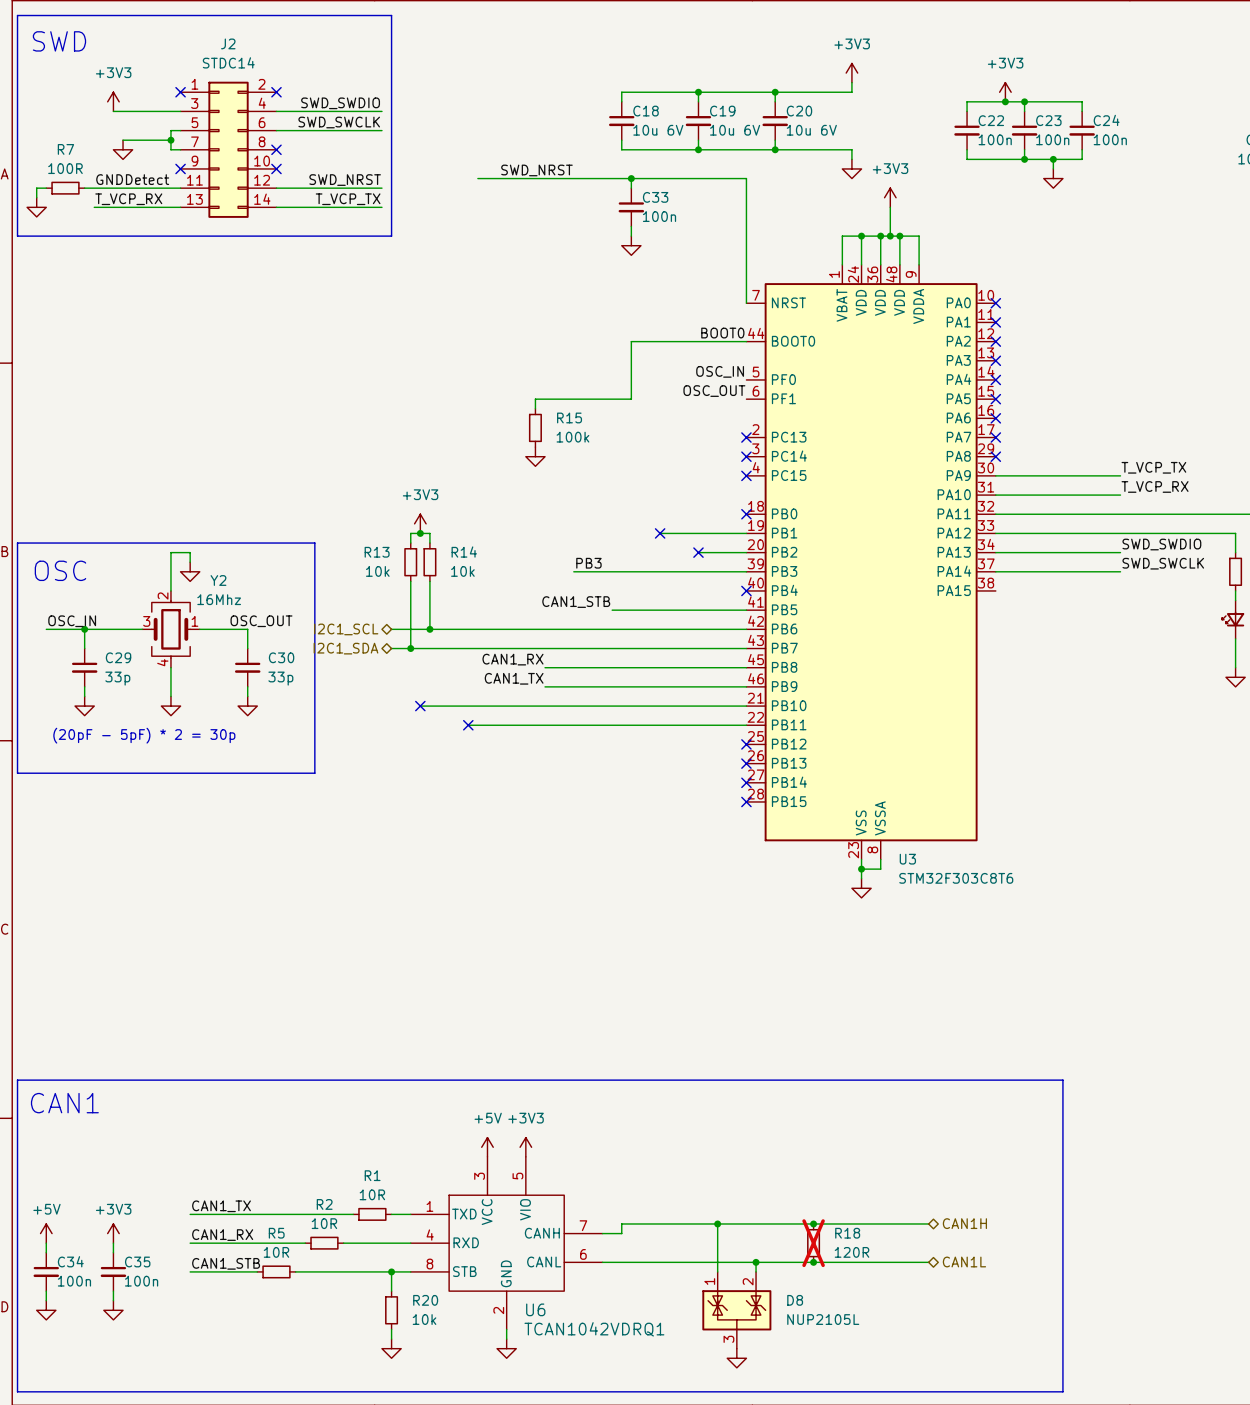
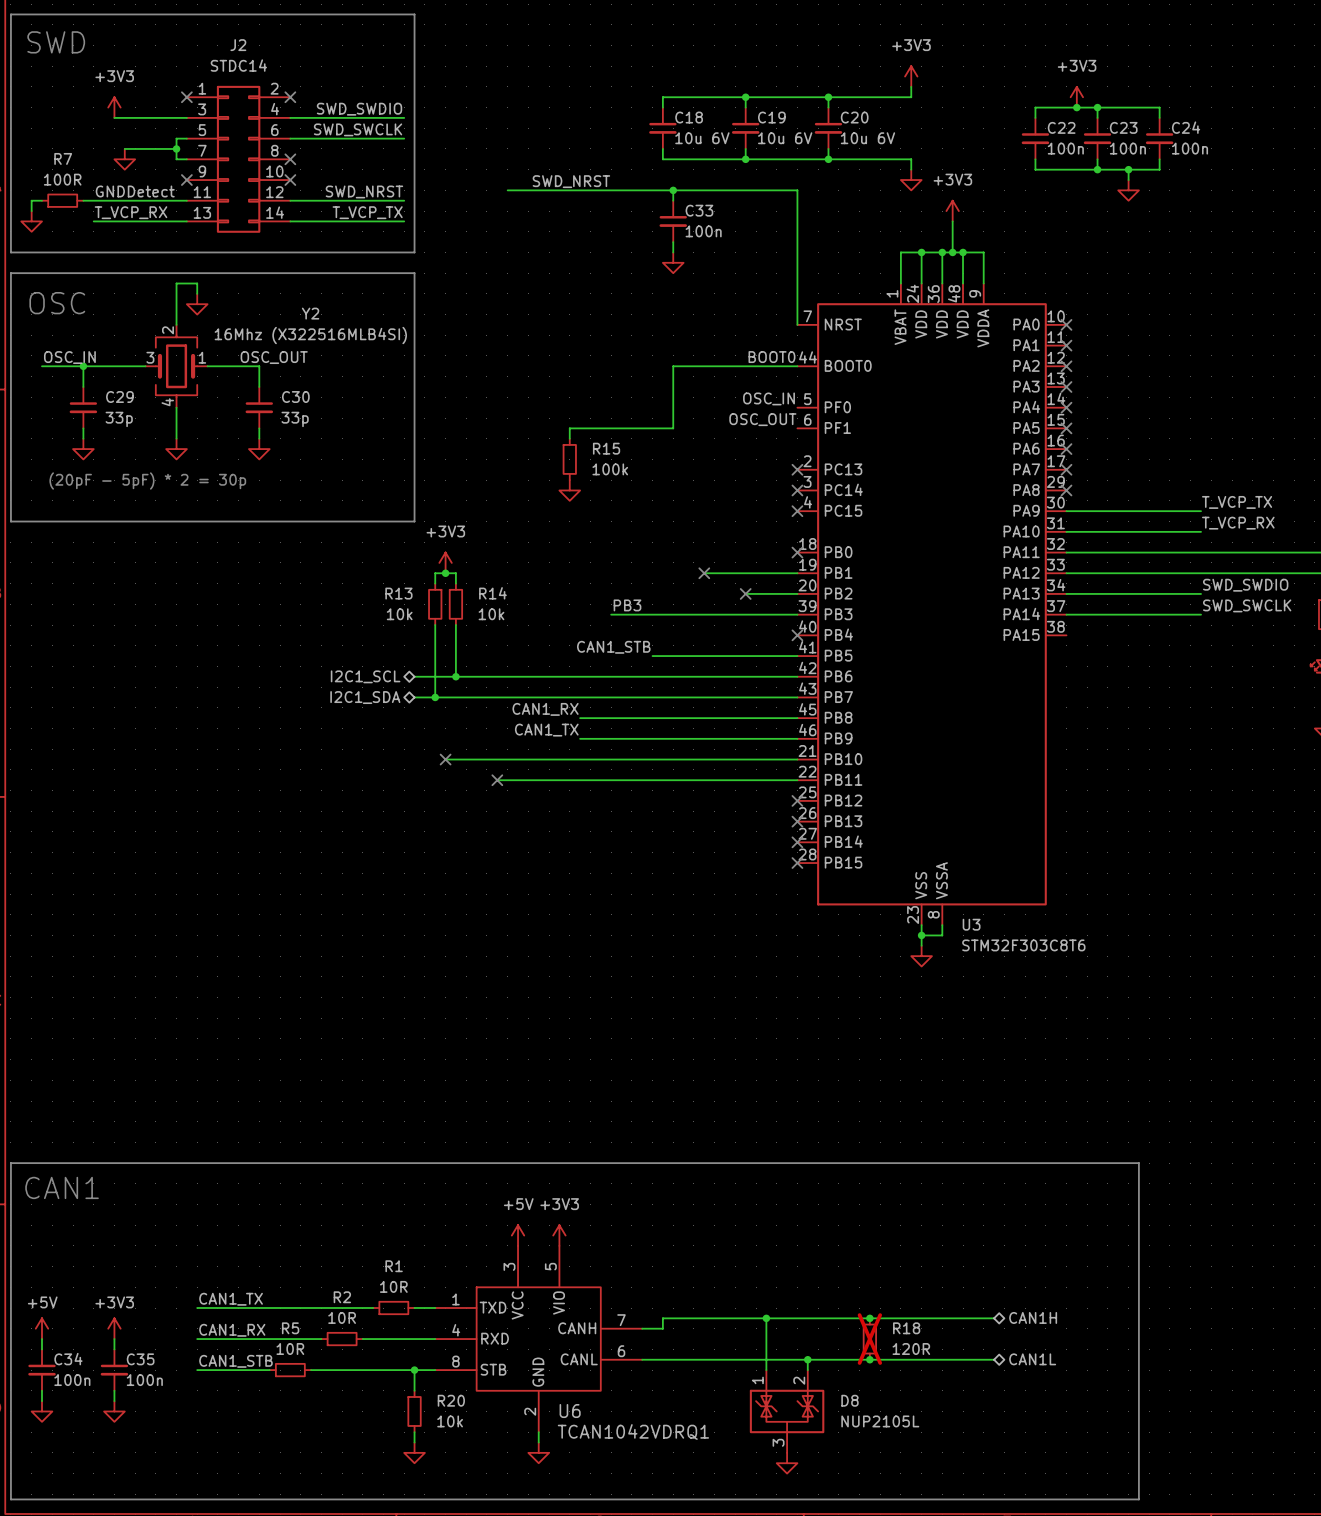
line: none -> (10, 273) (414, 273) (414, 521) (10, 521) (10, 273)
wire: none -> (197, 293) (197, 283) (176, 283) (176, 324)
text: none -> OSC (57, 303)
power symbol: none -> (197, 304)
label: none -> OSC_IN (69, 357)
label: none -> OSC_OUT (274, 357)
wire: none -> (42, 366) (145, 366)
wire: none -> (83, 366) (83, 386)
junction: none -> (83, 366)
wire: none -> (207, 366) (259, 366) (259, 386)
wire: none -> (176, 407) (176, 438)
wire: none -> (83, 428) (83, 438)
wire: none -> (259, 428) (259, 438)
power symbol: none -> (83, 449)
power symbol: none -> (176, 449)
power symbol: none -> (259, 449)
text: none -> (20pF - 5pF) * 2 = 30p (147, 481)
line: (17, 543) (314, 543) (314, 773) (17, 773) (17, 543) -> none
wire: (190, 562) (190, 552) (170, 552) (170, 590) -> none
text: OSC (60, 570) -> none
power symbol: (190, 571) -> none
Y2 name position: Y2 (218, 580) -> Y2 (310, 313)
Y2 value: 16Mhz (219, 599) -> 16Mhz (X322516MLB4SI) (310, 335)
label: OSC_IN (72, 621) -> none
label: OSC_OUT (261, 621) -> none
wire: (46, 629) (142, 629) -> none
wire: (84, 629) (84, 648) -> none
junction: (84, 629) -> none
Y2 position: (170, 629) -> (176, 366)
wire: (199, 629) (247, 629) (247, 648) -> none
C29 position: (84, 667) -> (83, 407)
wire: (170, 667) (170, 696) -> none
C30 position: (247, 667) -> (259, 407)
wire: (84, 686) (84, 696) -> none
wire: (247, 686) (247, 696) -> none
power symbol: (84, 706) -> none
power symbol: (170, 706) -> none
power symbol: (247, 706) -> none
text: (20pF - 5pF) * 2 = 30p (144, 735) -> none

